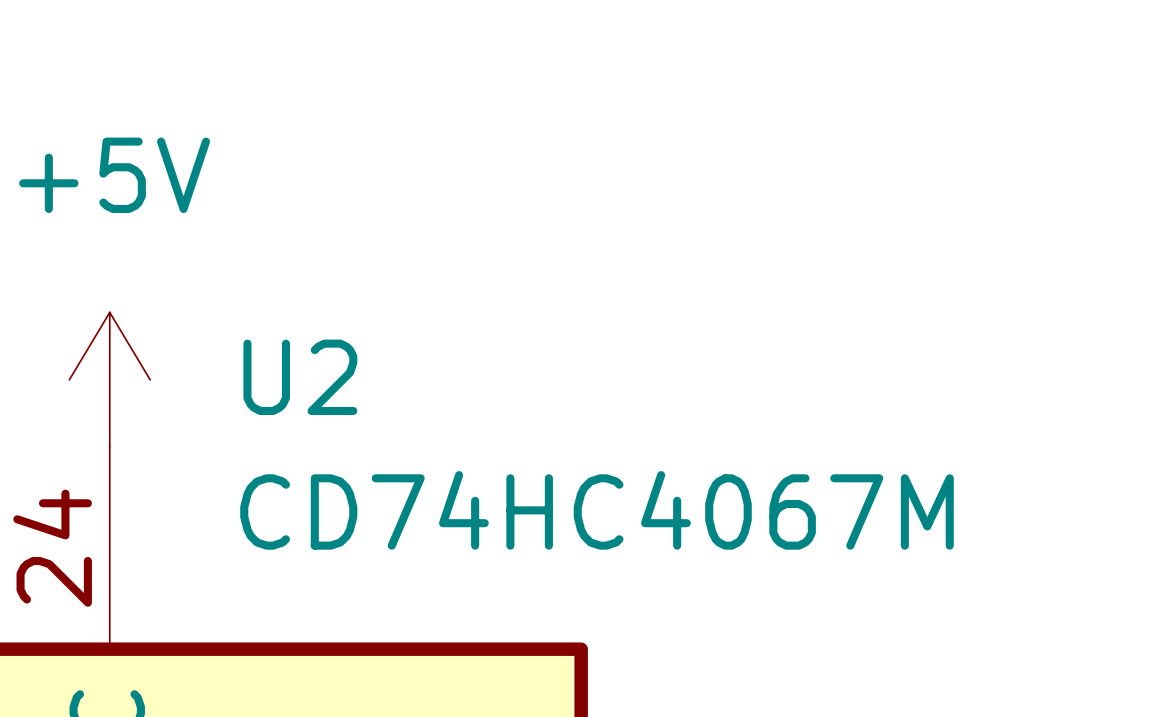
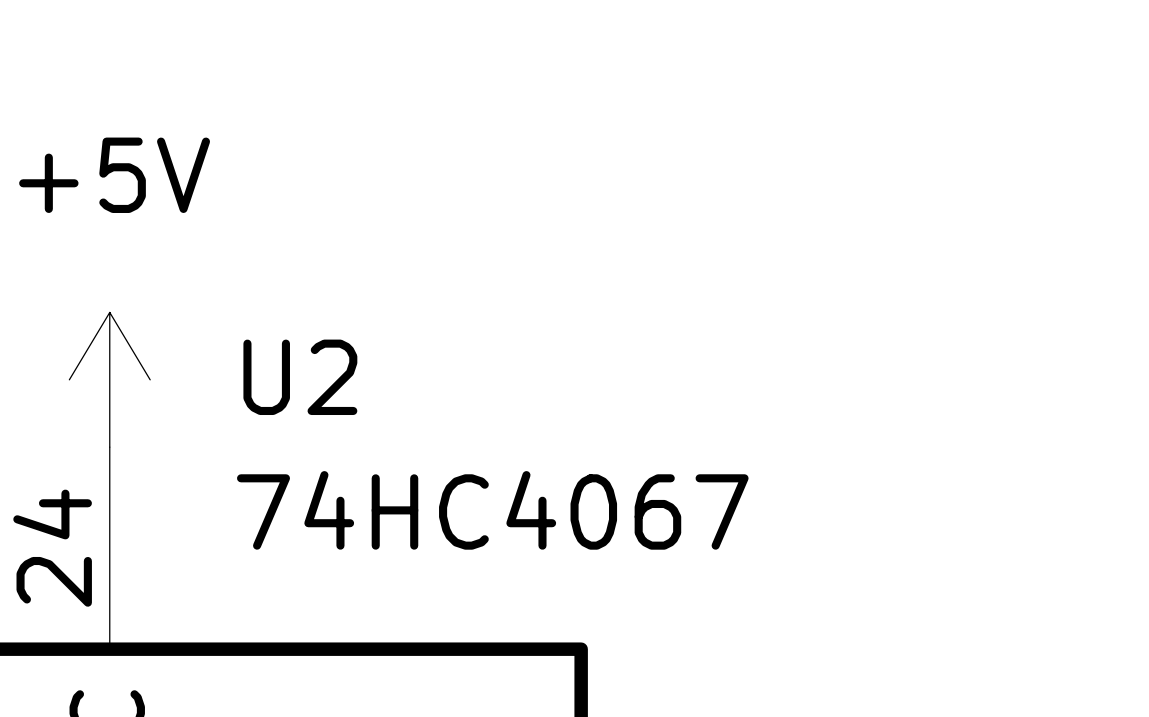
U2 value: CD74HC4067M (597, 510) -> 74HC4067 (492, 510)

